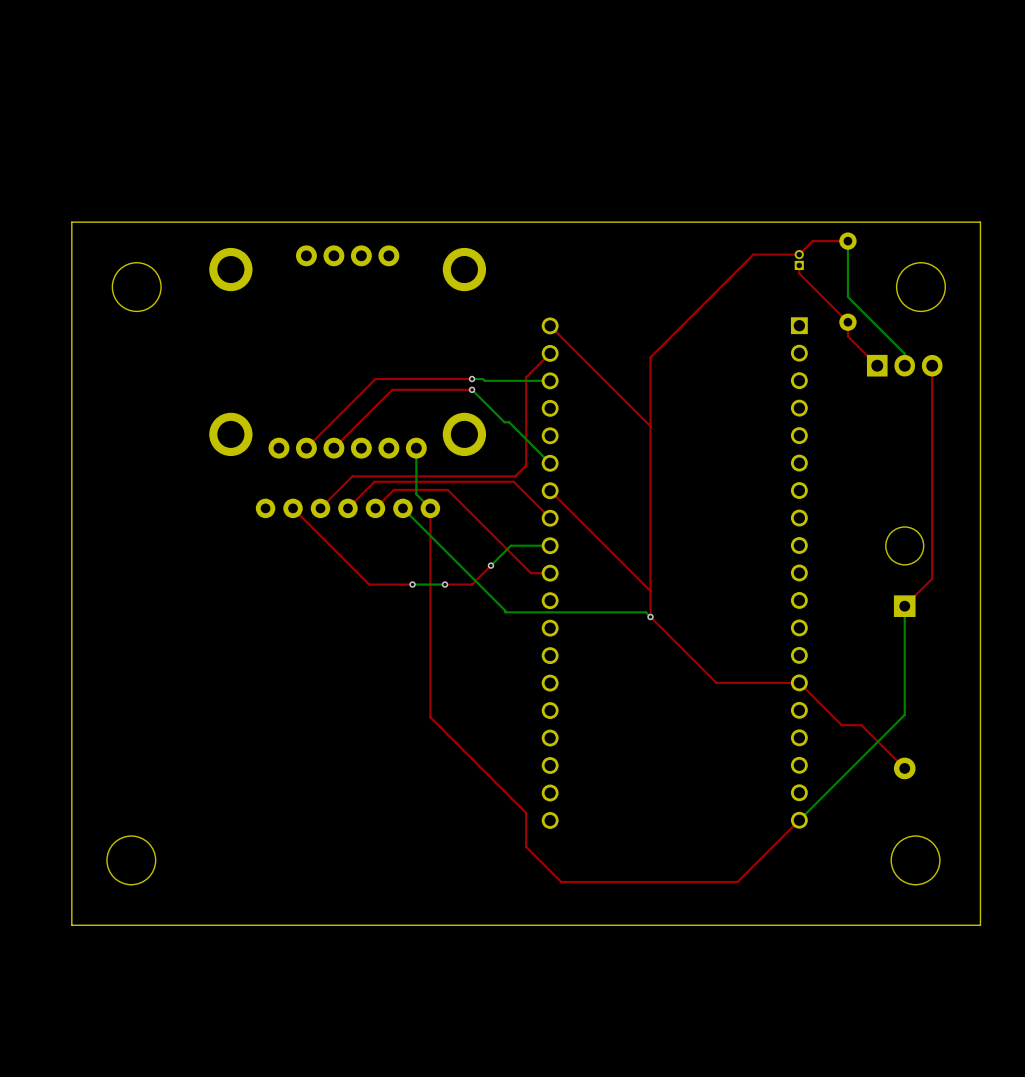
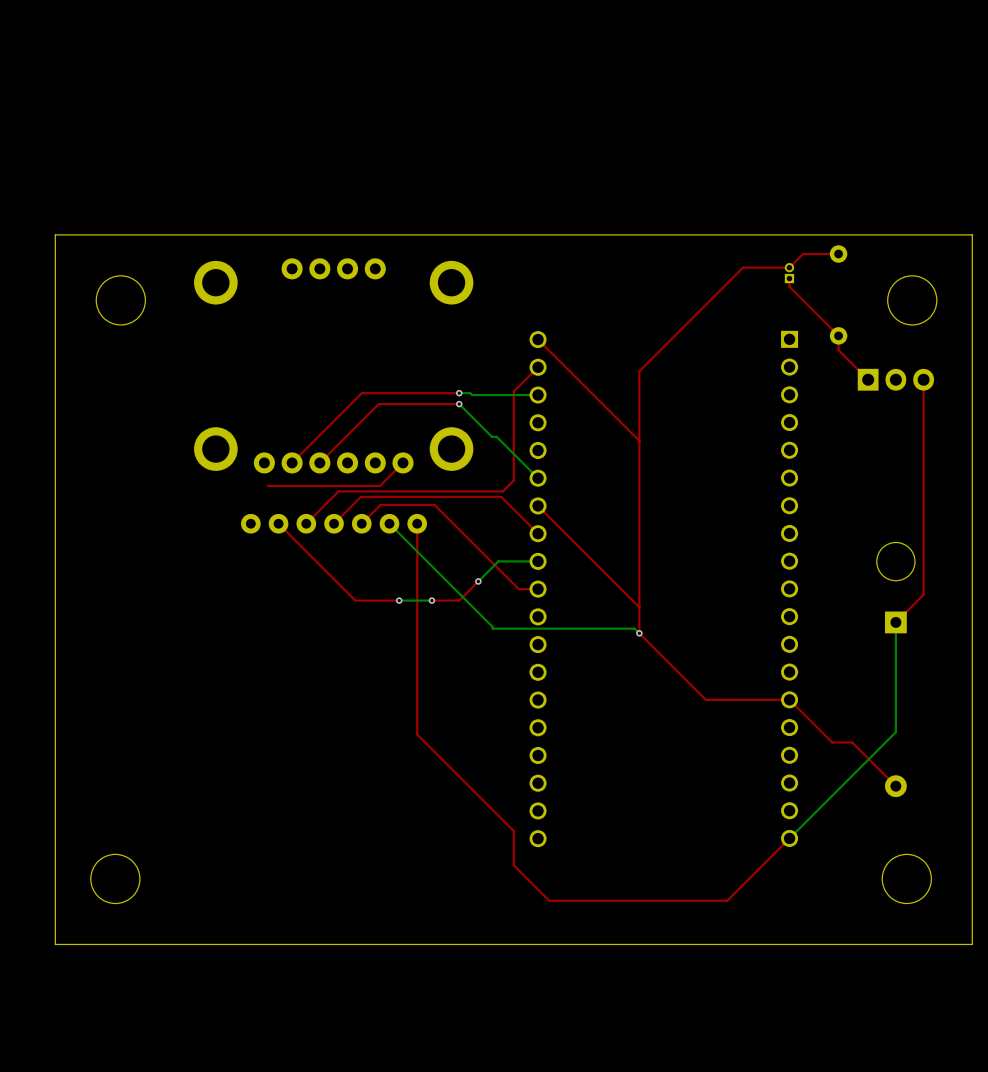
bottom track: (847, 241) (847, 296) (904, 353) (904, 365) -> none
top track: none -> (403, 462) (379, 485) (267, 485)
bottom track: (416, 448) (416, 494) (430, 508) -> none

